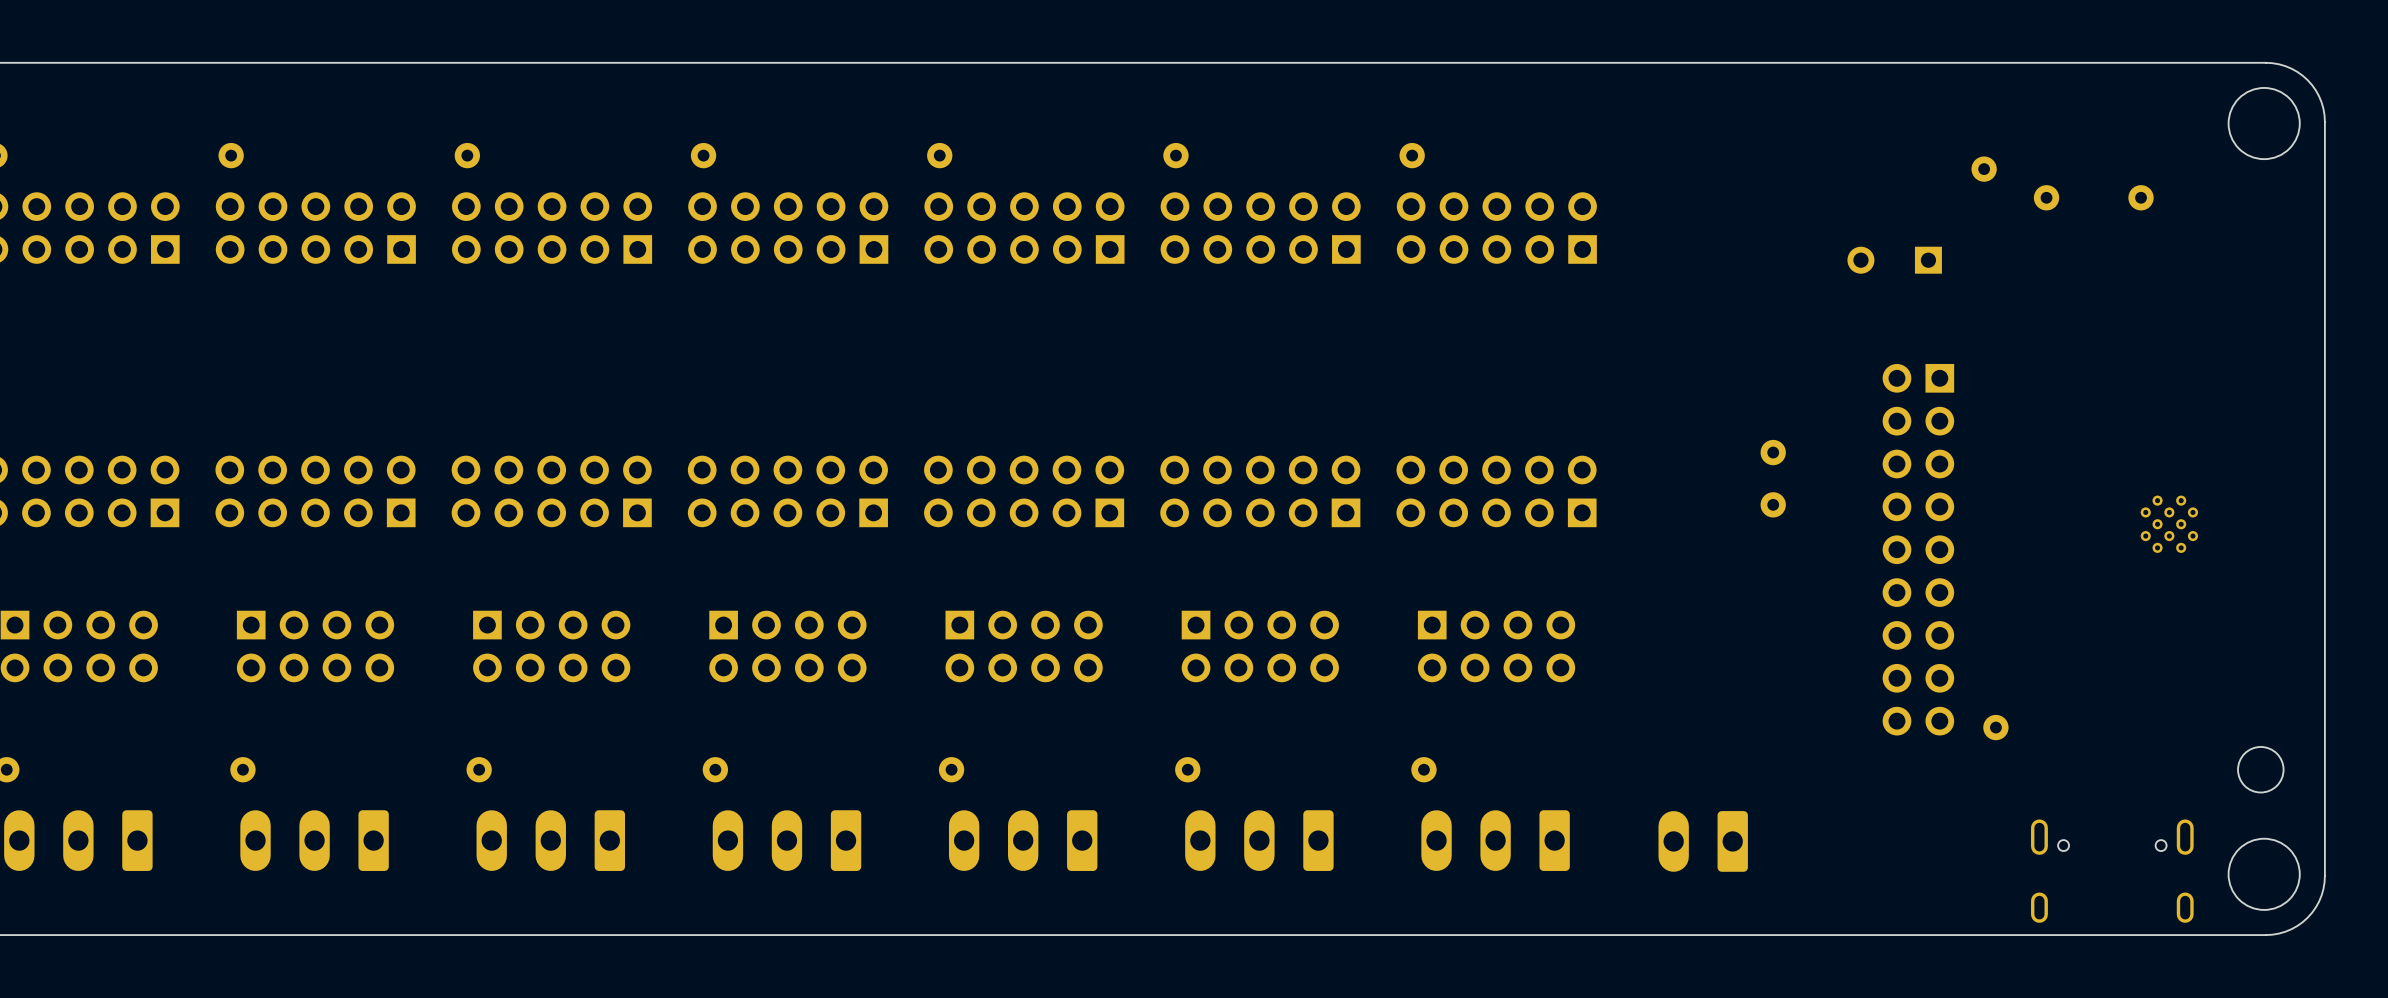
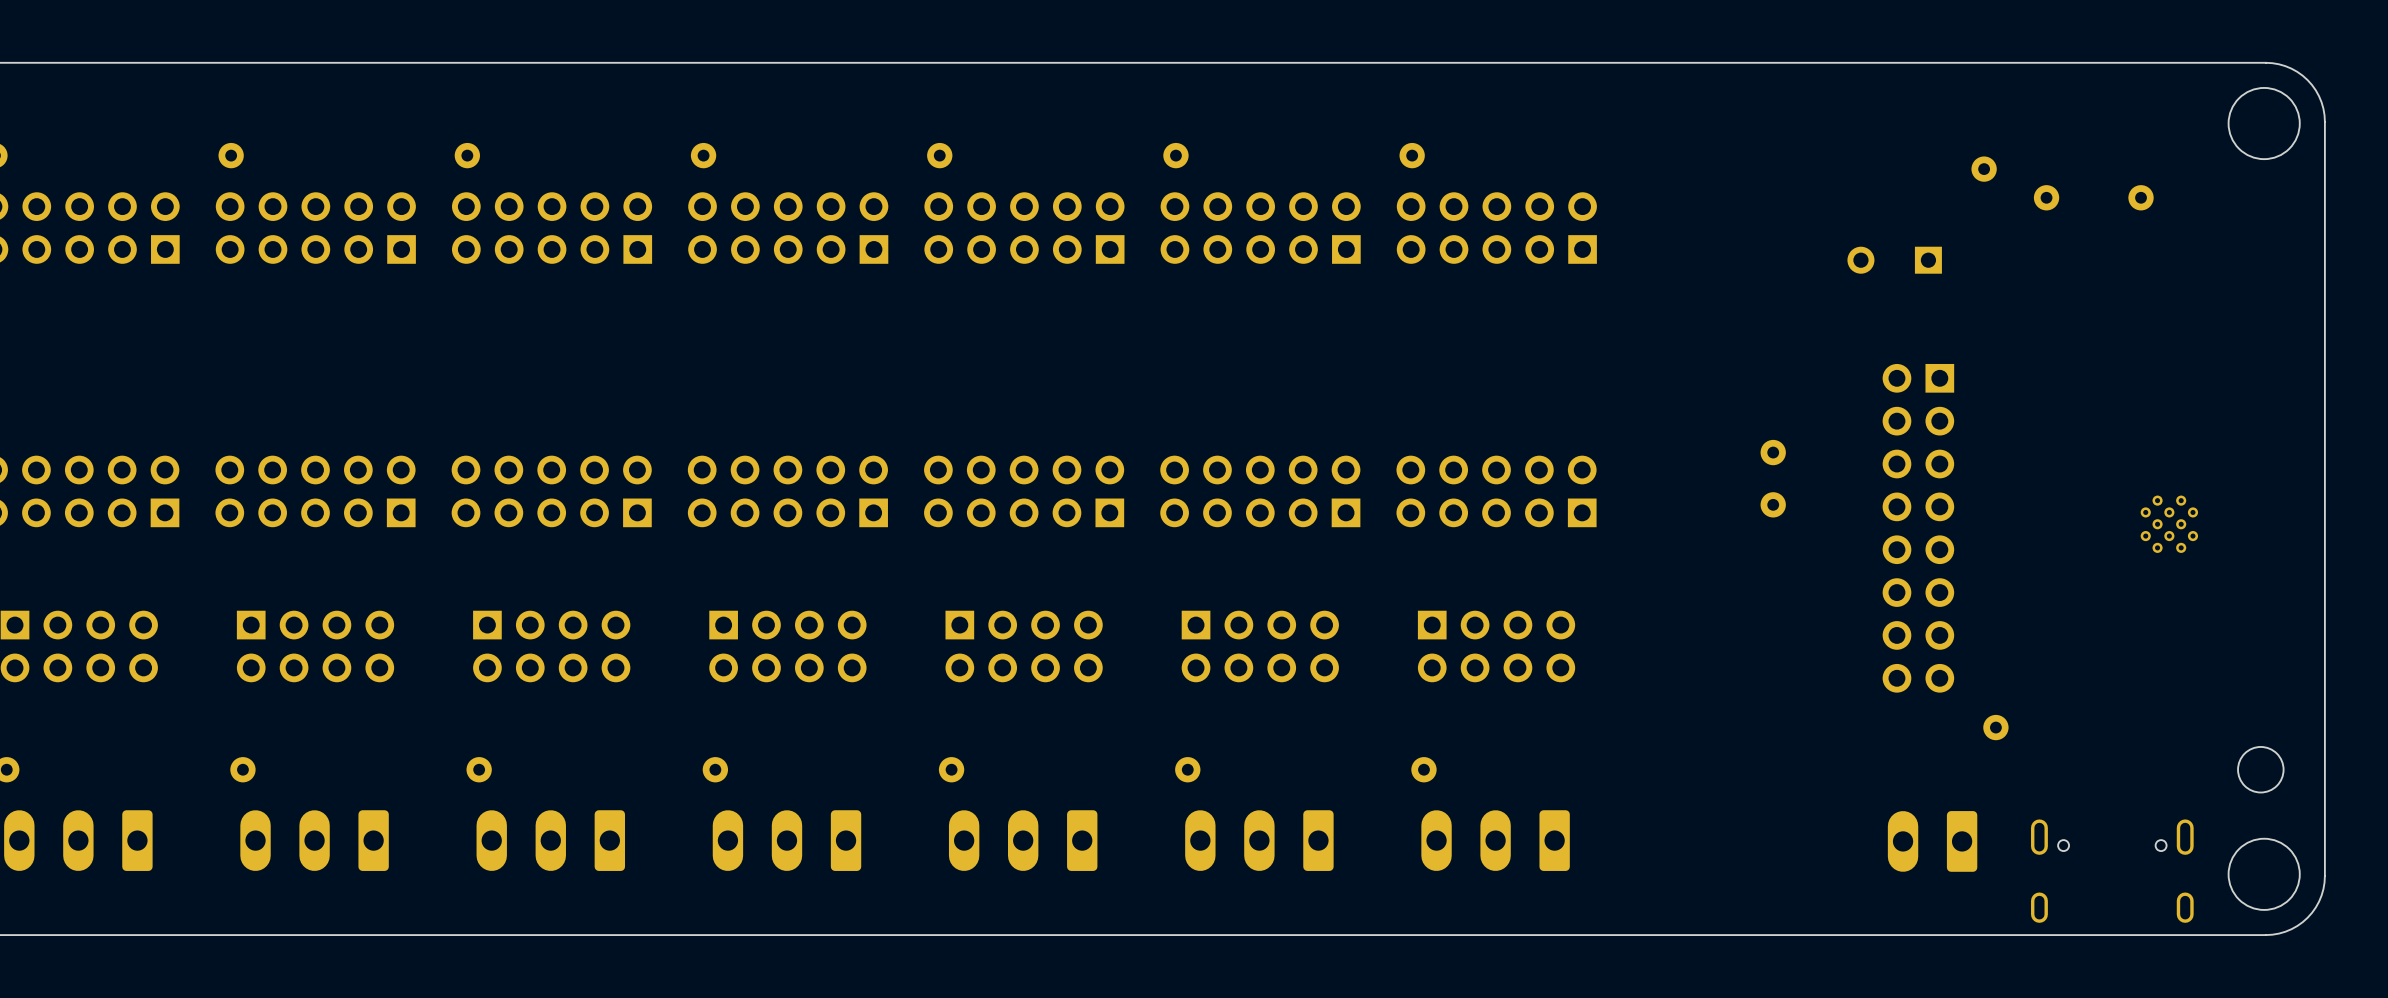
part: (1918, 549) -> none
part position: (1703, 841) -> (1932, 841)

